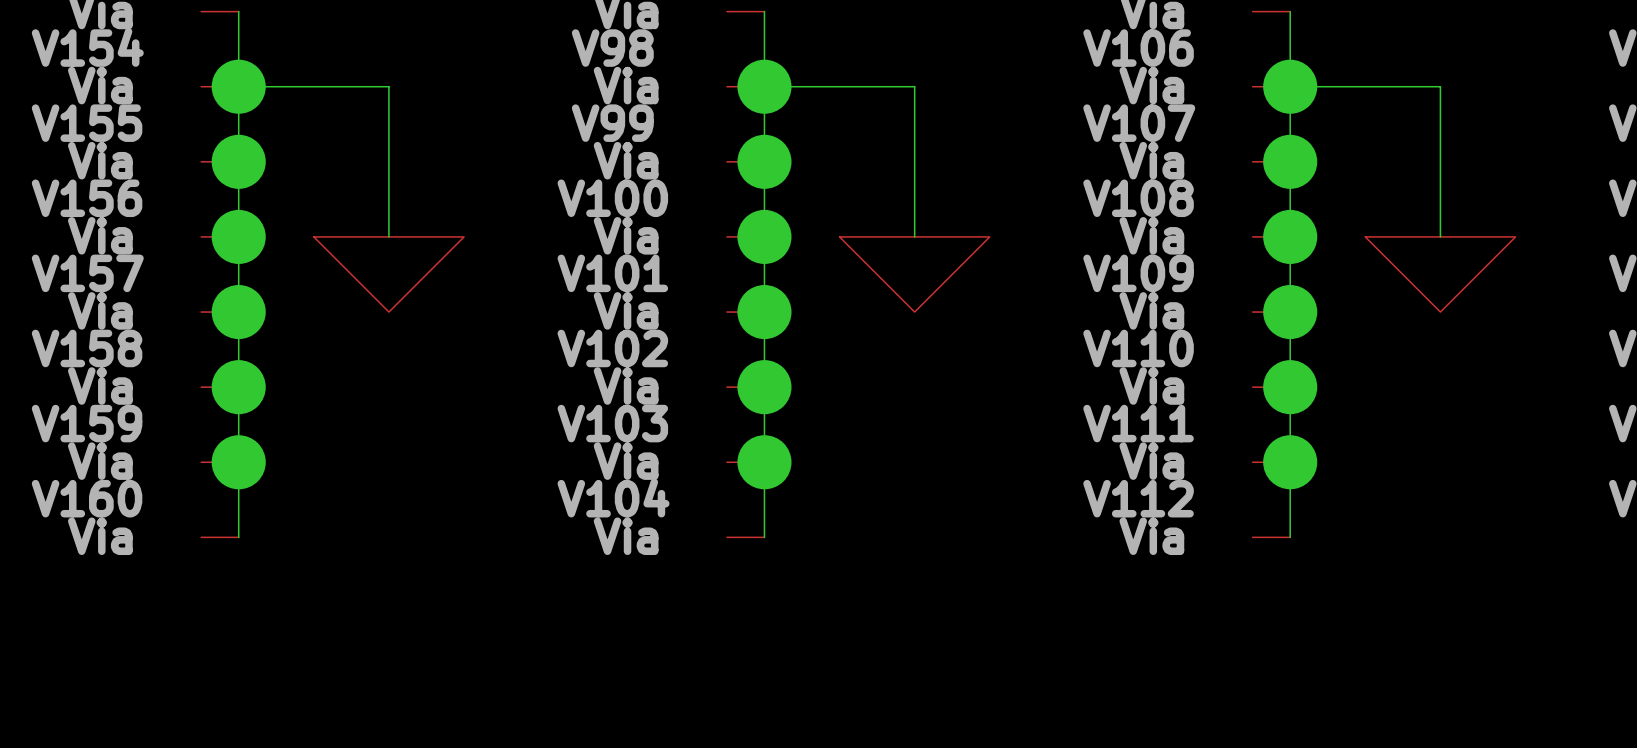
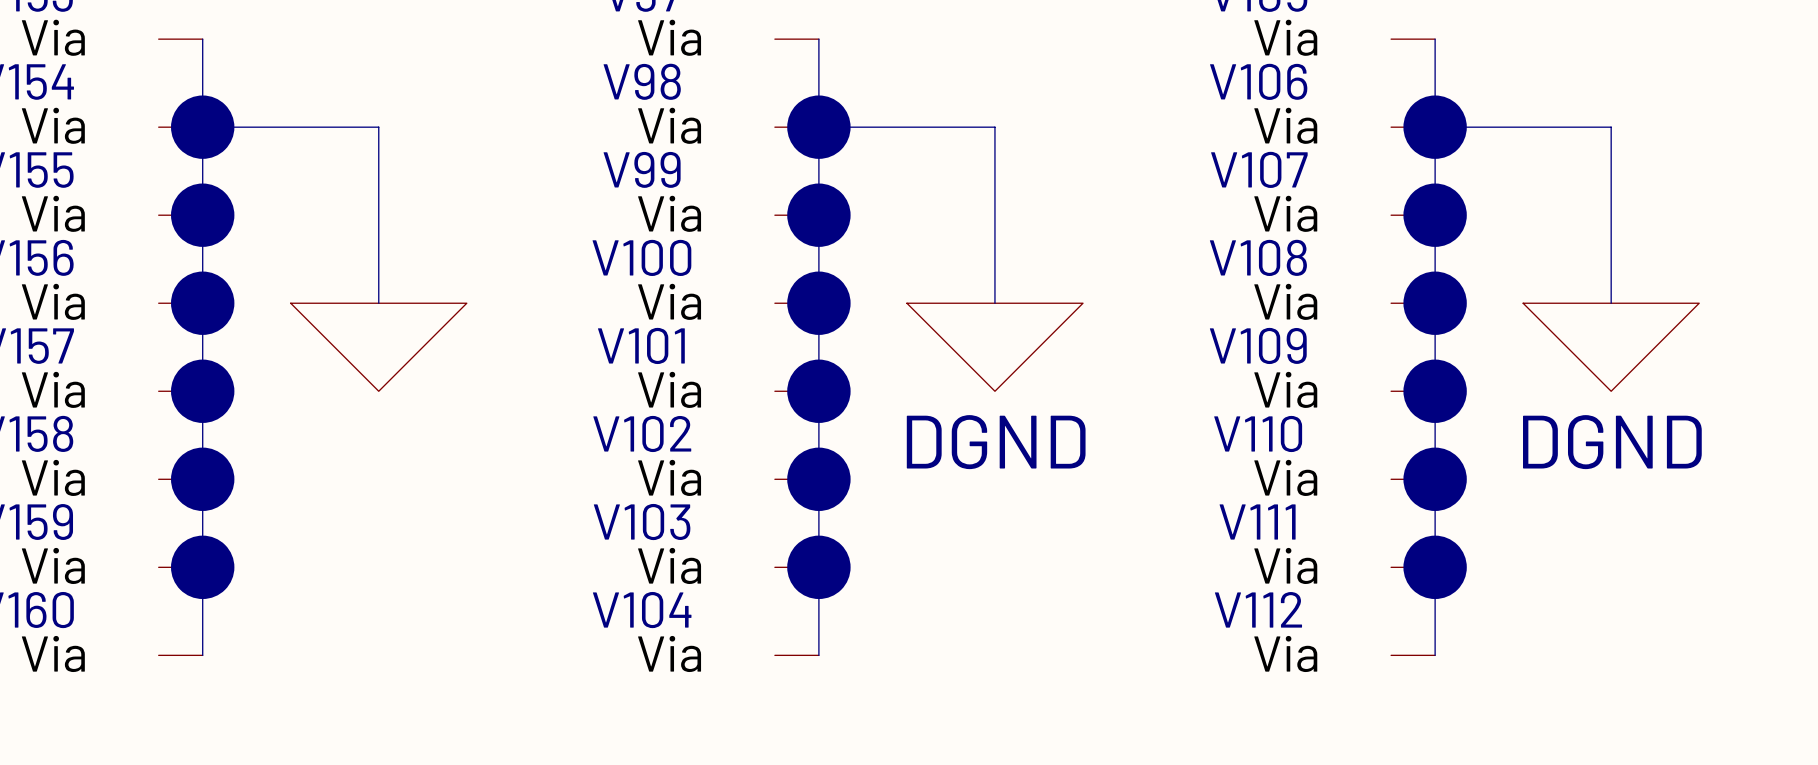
power symbol text: none -> DGND (996, 442)
power symbol text: none -> DGND (1612, 442)

